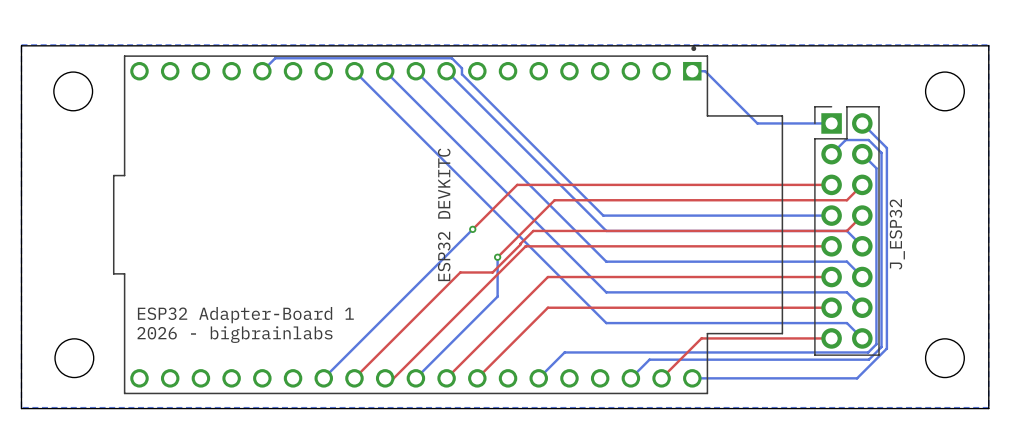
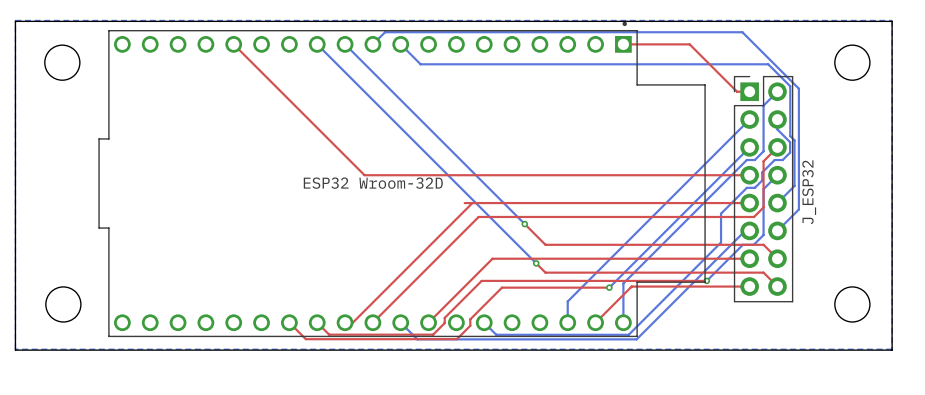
bottom track: (262, 71) (275, 58) (451, 58) (461, 68) (461, 74) (603, 215) (831, 215) -> none
top track: none -> (233, 44) (364, 175) (749, 175)
bottom track: (415, 71) (606, 261) (846, 261) (862, 277) -> (372, 44) (385, 32) (742, 32) (798, 88) (798, 209) (777, 230)
bottom track: (692, 71) (705, 71) (757, 123) (831, 123) -> none
top track: none -> (623, 44) (689, 44) (737, 91) (749, 91)
bottom track: (468, 93) (606, 230) (846, 230) (862, 246) -> (420, 64) (768, 64) (790, 86) (790, 132)
bottom track: (862, 123) (886, 148) (886, 348) (857, 378) (692, 378) -> (777, 91) (763, 105) (763, 151) (754, 160) (746, 160) (623, 283) (623, 322)
bottom track: (831, 154) (845, 140) (868, 140) (881, 152) (881, 347) (868, 359) (649, 359) (630, 378) -> (749, 119) (567, 301) (567, 322)
bottom track: (862, 154) (876, 168) -> none
bottom track: (876, 172) (876, 344) (868, 352) (564, 352) (538, 378) -> (777, 119) (777, 129) (790, 142) (790, 152) (782, 160) (774, 160) (762, 172) (762, 180) (754, 187) (746, 187) (721, 213) (721, 242) (628, 334) (496, 334) (484, 322)
bottom track: none -> (790, 136) (794, 140) (794, 186) (777, 203)
bottom track: none -> (749, 147) (609, 287)
top track: (831, 184) (517, 184) (472, 229) -> none
top track: (846, 200) (554, 200) (497, 257) -> (763, 161) (763, 207) (754, 216) (478, 216) (372, 322)
ESP32 DEVKITC name: ESP32 DEVKITC (444, 214) -> ESP32 Wroom-32D (373, 183)
top track: (862, 215) (846, 230) (533, 230) (492, 272) (460, 272) (354, 378) -> (706, 280) (481, 280) (444, 317) (444, 323) (433, 334) (329, 334) (317, 322)
bottom track: (472, 229) (323, 378) -> none
via: (472, 229) -> none
bottom track: (497, 257) (497, 296) (415, 378) -> none
via: (497, 257) -> none
bottom track: (583, 269) (606, 292) (824, 292) -> (706, 280) (742, 244)
top track: none -> (524, 224) (545, 244) (763, 244) (777, 258)
via: none -> (524, 224)
bottom track: none -> (749, 230) (745, 230) (636, 339) (417, 339) (400, 322)
top track: (831, 277) (547, 277) (446, 378) -> none
bottom track: (836, 292) (846, 292) (862, 307) -> (753, 244) (763, 235) (763, 189) (777, 175)
bottom track: (596, 312) (606, 323) (846, 323) (862, 338) -> none
top track: none -> (536, 263) (545, 272) (763, 272) (777, 286)
via: none -> (536, 263)
text: ESP32 Adapter-Board 1 (245, 315) -> none
via: none -> (706, 280)
text: 2026 - bigbrainlabs (234, 334) -> none
top track: none -> (609, 287) (502, 287) (470, 319) (470, 325) (456, 339) (305, 339) (289, 322)
via: none -> (609, 287)

